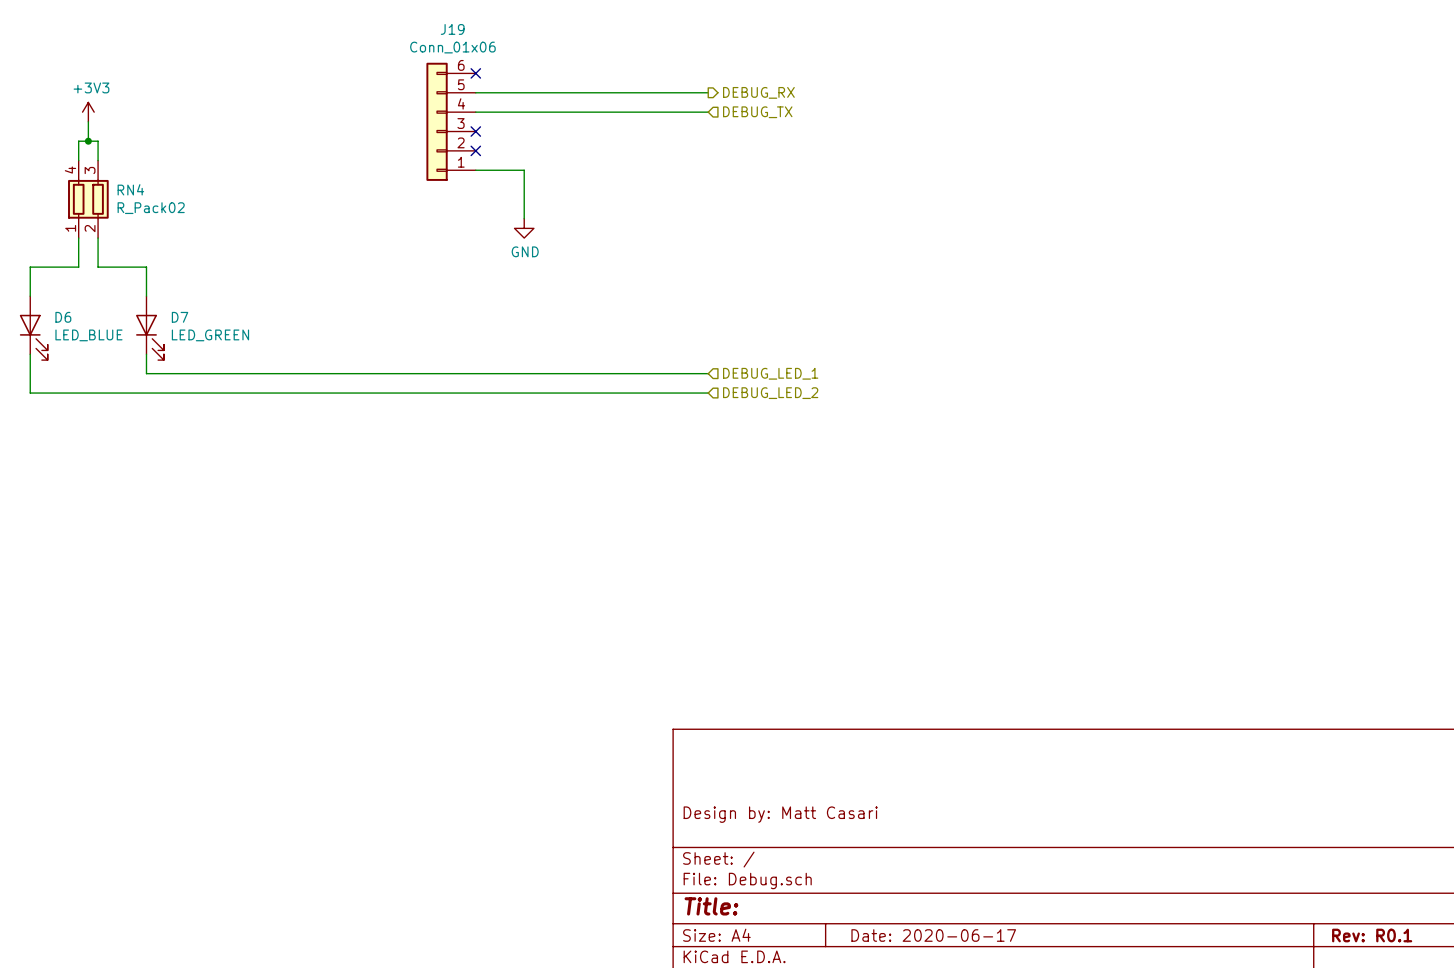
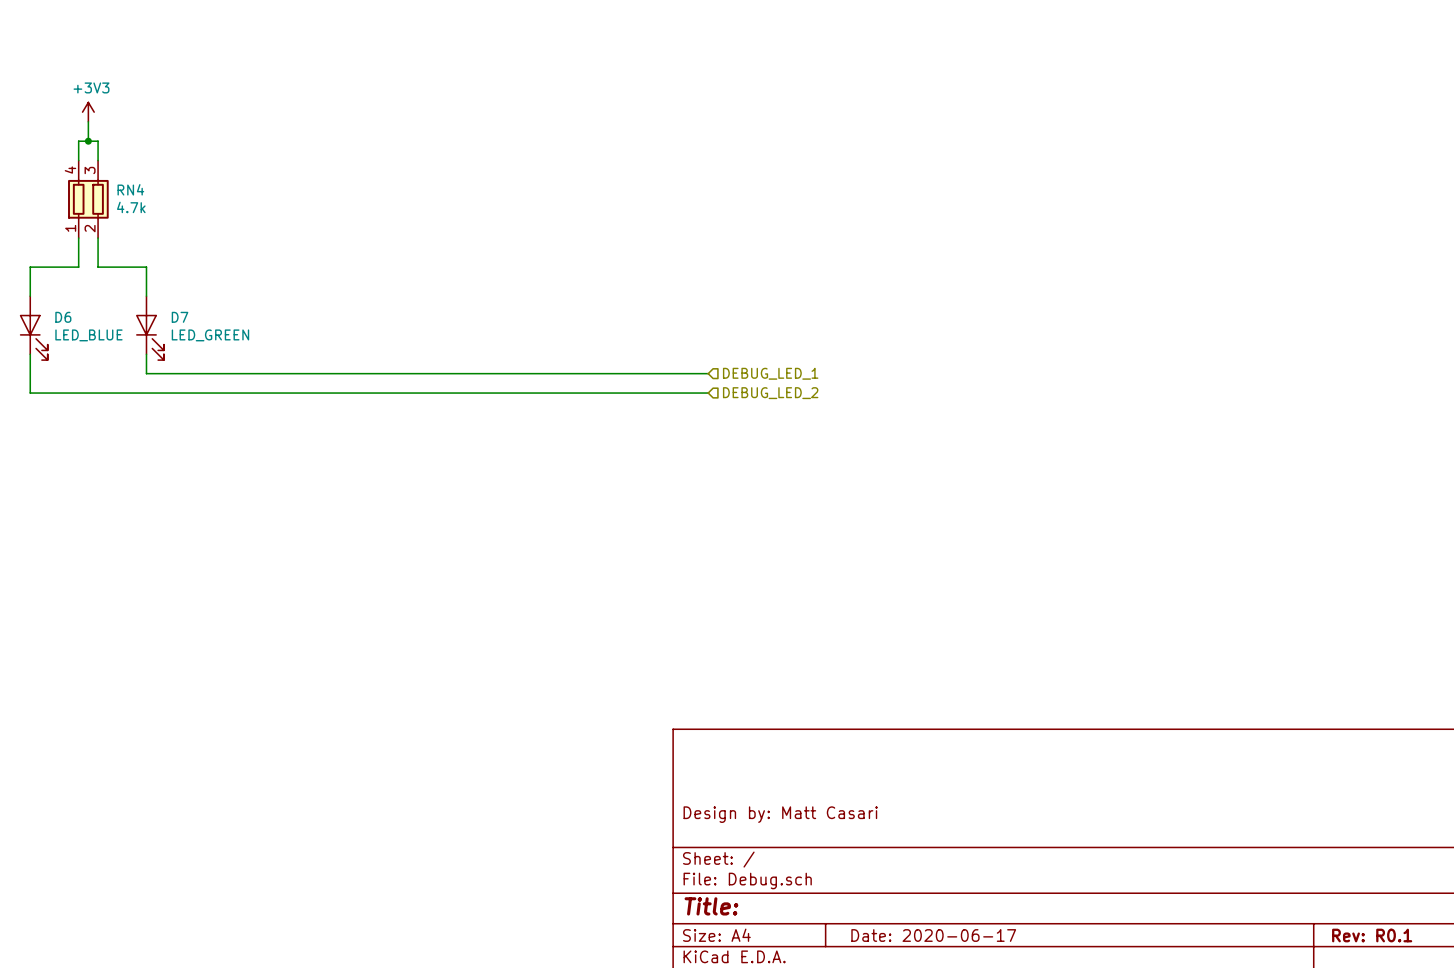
no-connect mark: (475, 73) -> none
wire: (475, 92) (708, 92) -> none
hierarchical label: DEBUG_RX (758, 92) -> none
wire: (475, 112) (708, 112) -> none
hierarchical label: DEBUG_TX (757, 112) -> none
J19: Conn_01x06 (451, 121) -> none
no-connect mark: (475, 131) -> none
no-connect mark: (475, 150) -> none
wire: (475, 170) (524, 170) (524, 218) -> none
RN4 value: R_Pack02 (151, 208) -> 4.7k (131, 207)
power symbol: GND (524, 228) -> none

